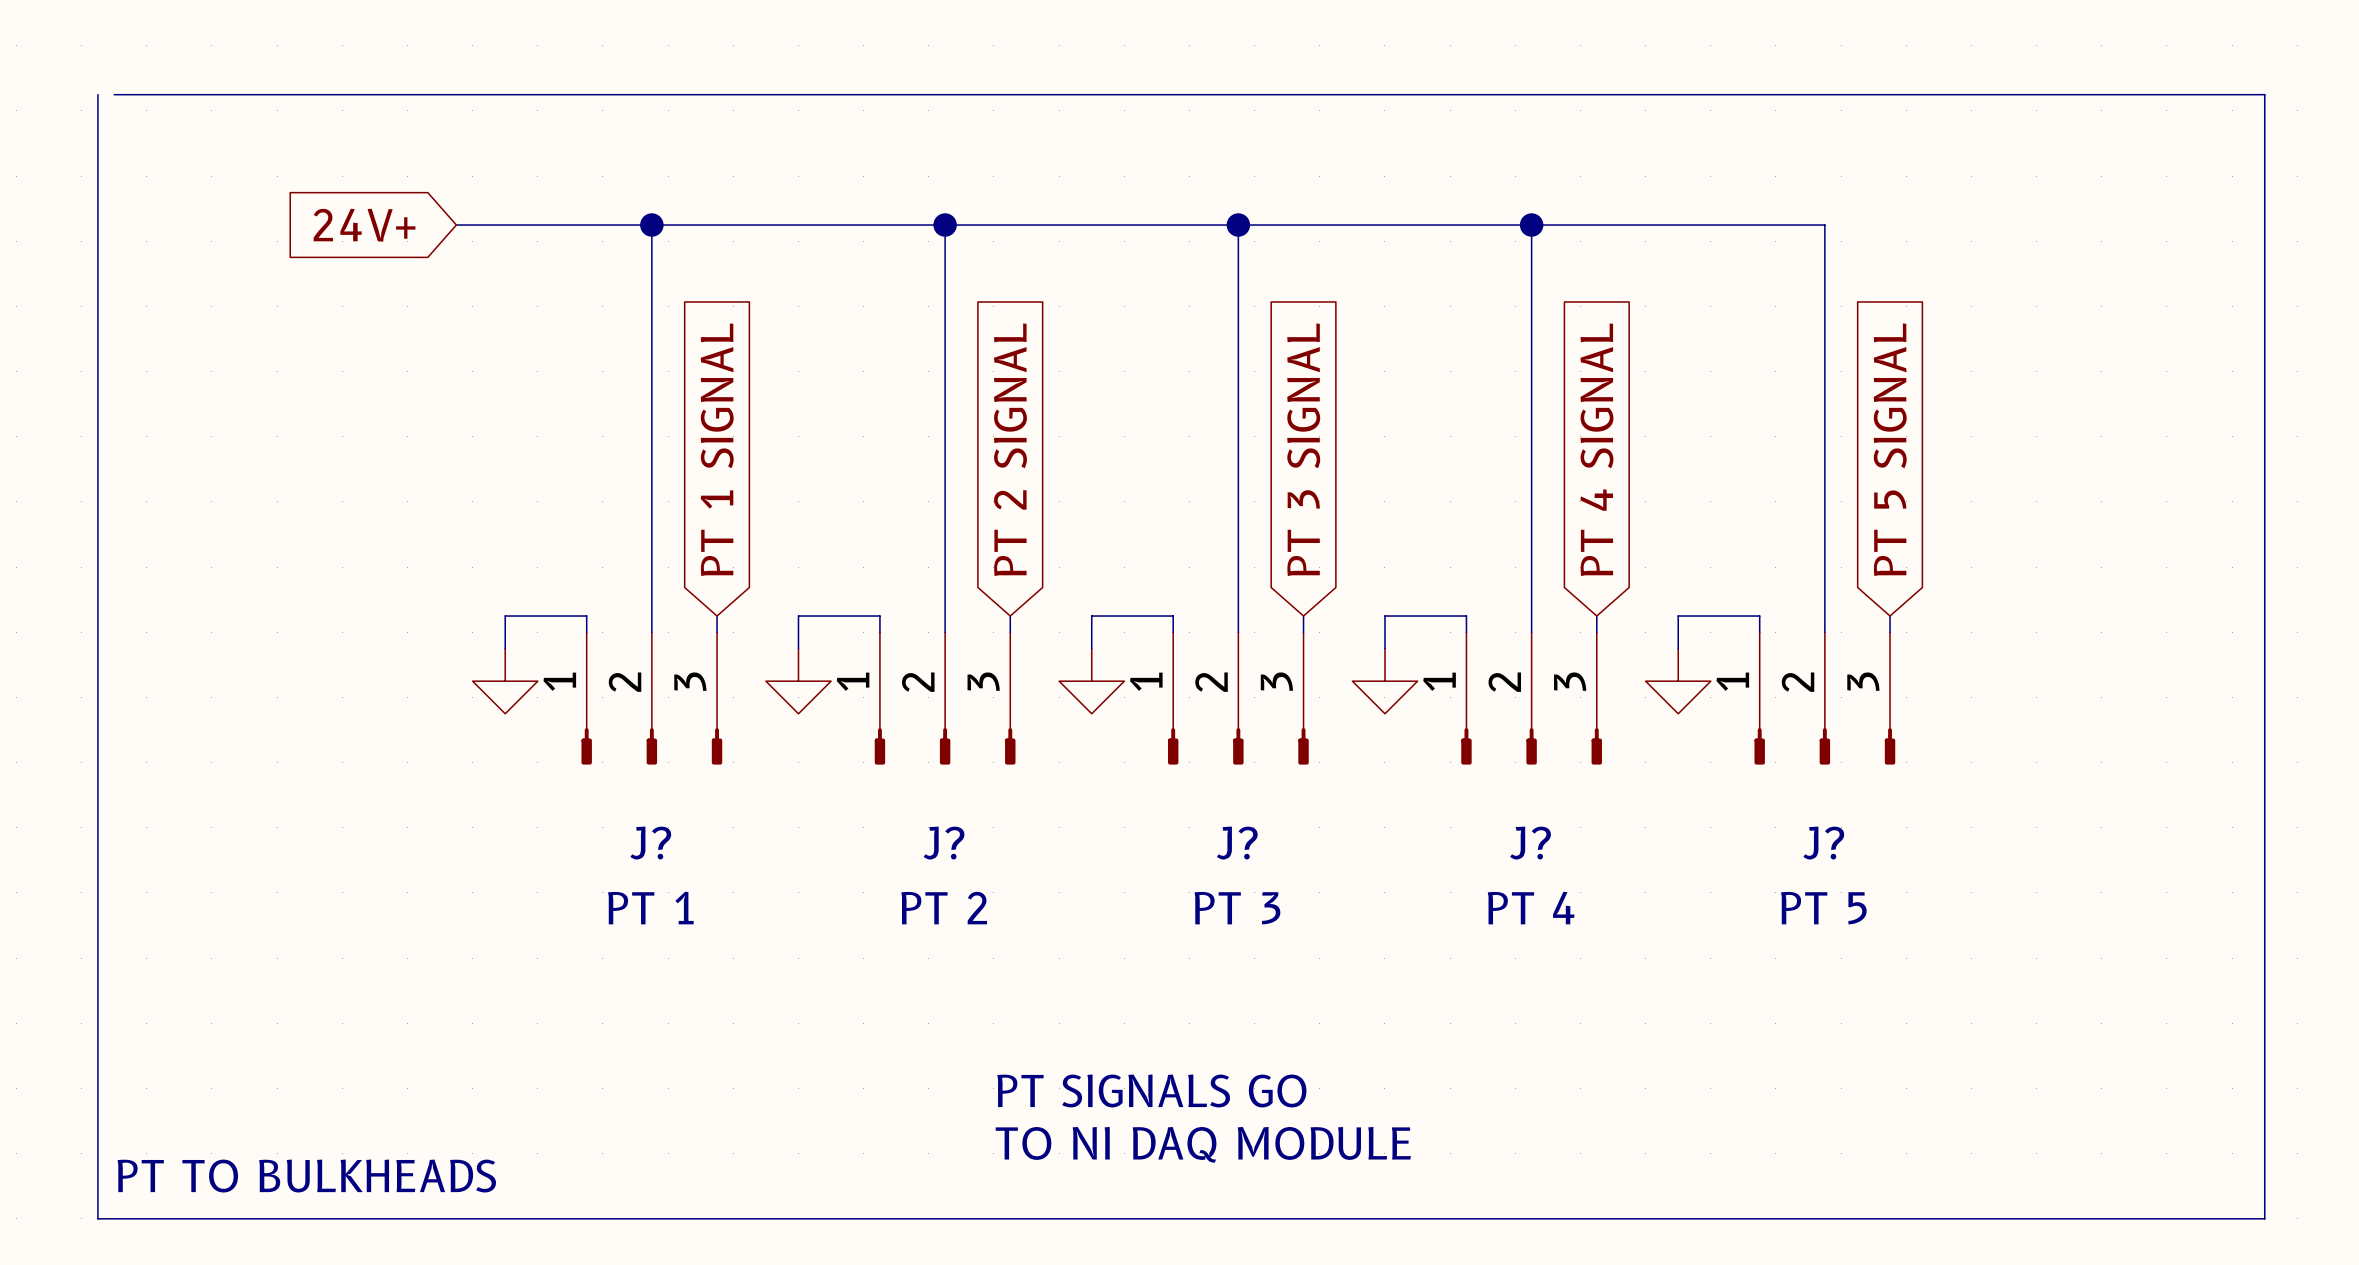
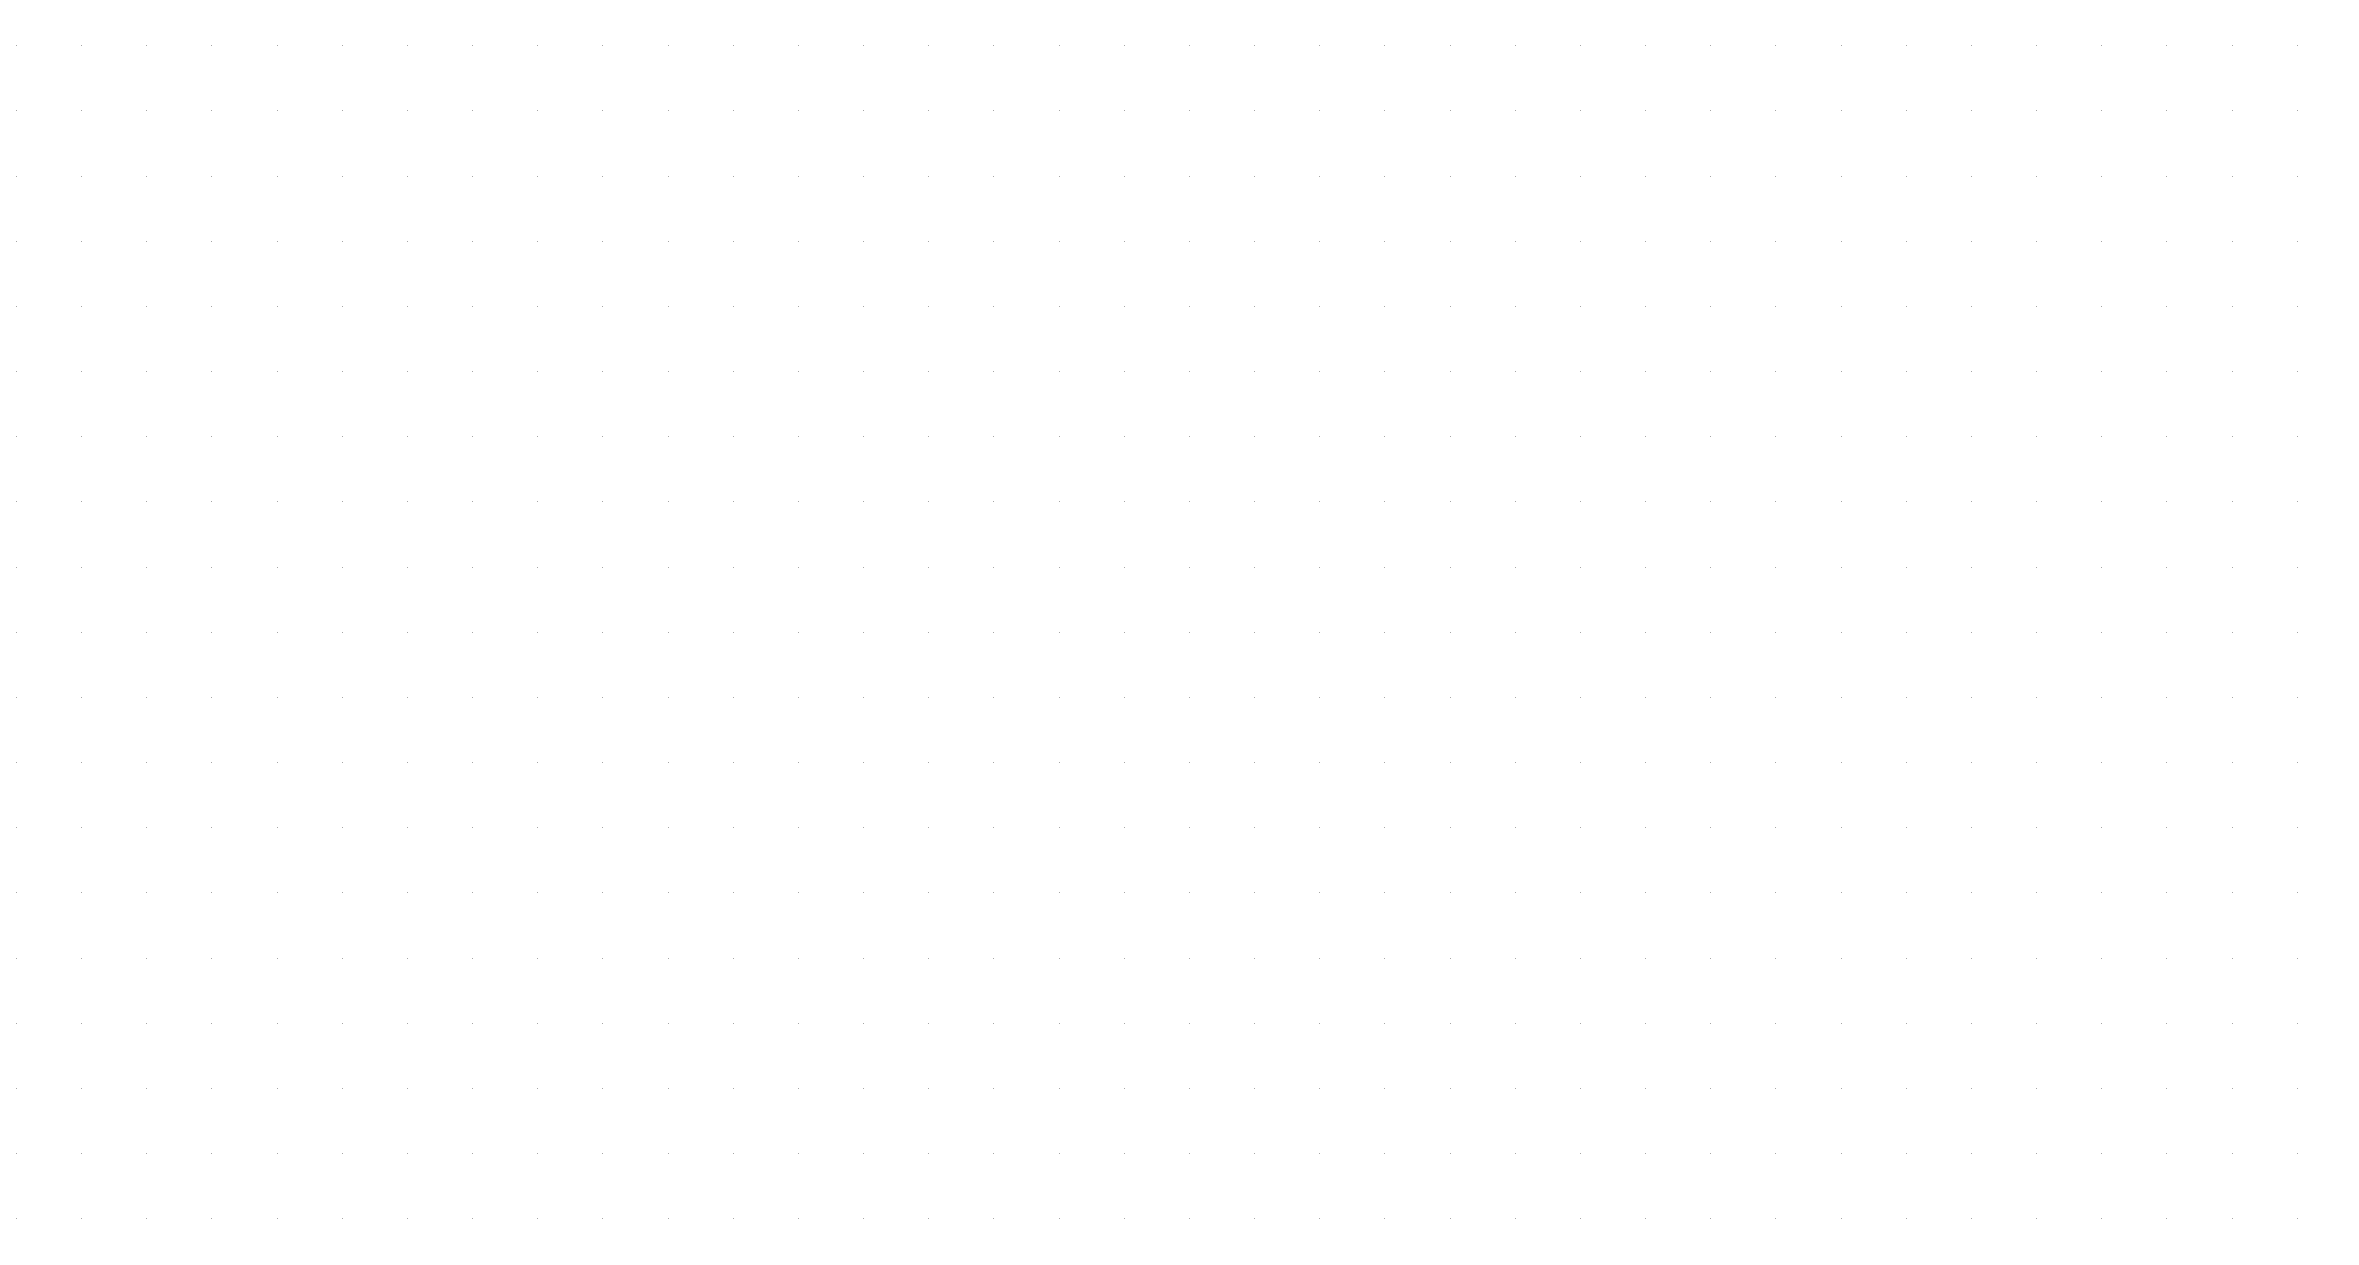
line: (97, 94) (97, 1218) (2264, 1218) (2264, 94) (114, 94) -> none
global label: 24V+ (364, 225) -> none
wire: (456, 225) (1824, 225) (1824, 632) -> none
wire: (651, 225) (651, 632) -> none
junction: (651, 225) -> none
wire: (945, 225) (945, 632) -> none
junction: (945, 225) -> none
wire: (1238, 225) (1238, 632) -> none
junction: (1238, 225) -> none
wire: (1531, 225) (1531, 632) -> none
junction: (1531, 225) -> none
global label: PT 1 SIGNAL (717, 449) -> none
global label: PT 2 SIGNAL (1010, 449) -> none
global label: PT 3 SIGNAL (1303, 449) -> none
global label: PT 4 SIGNAL (1596, 449) -> none
global label: PT 5 SIGNAL (1890, 449) -> none
wire: (717, 616) (717, 632) -> none
wire: (1010, 616) (1010, 632) -> none
wire: (1303, 616) (1303, 632) -> none
wire: (1596, 616) (1596, 632) -> none
wire: (1890, 616) (1890, 632) -> none
wire: (586, 632) (586, 616) (505, 616) (505, 648) -> none
wire: (879, 632) (879, 616) (798, 616) (798, 648) -> none
wire: (1173, 632) (1173, 616) (1091, 616) (1091, 648) -> none
wire: (1466, 632) (1466, 616) (1384, 616) (1384, 648) -> none
wire: (1759, 632) (1759, 616) (1678, 616) (1678, 648) -> none
power symbol: (505, 681) -> none
power symbol: (798, 681) -> none
power symbol: (1091, 681) -> none
power symbol: (1384, 681) -> none
power symbol: (1678, 681) -> none
J?: PT 1 (651, 698) -> none
J?: PT 2 (945, 698) -> none
J?: PT 3 (1238, 698) -> none
J?: PT 4 (1531, 698) -> none
J?: PT 5 (1824, 698) -> none
text: PT SIGNALS GO (1151, 1090) -> none
text: TO NI DAQ MODULE (1203, 1144) -> none
text: PT TO BULKHEADS (306, 1176) -> none

